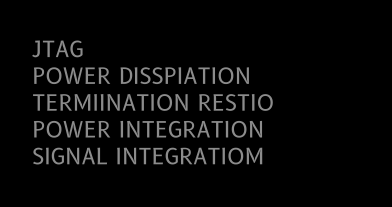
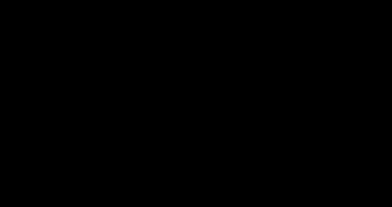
text: JTAG (57, 48) -> none
text: POWER DISSPIATION (141, 75) -> none
text: TERMIINATION RESTIO (152, 102) -> none
text: POWER INTEGRATION (147, 129) -> none
text: SIGNAL INTEGRATIOM (147, 156) -> none

